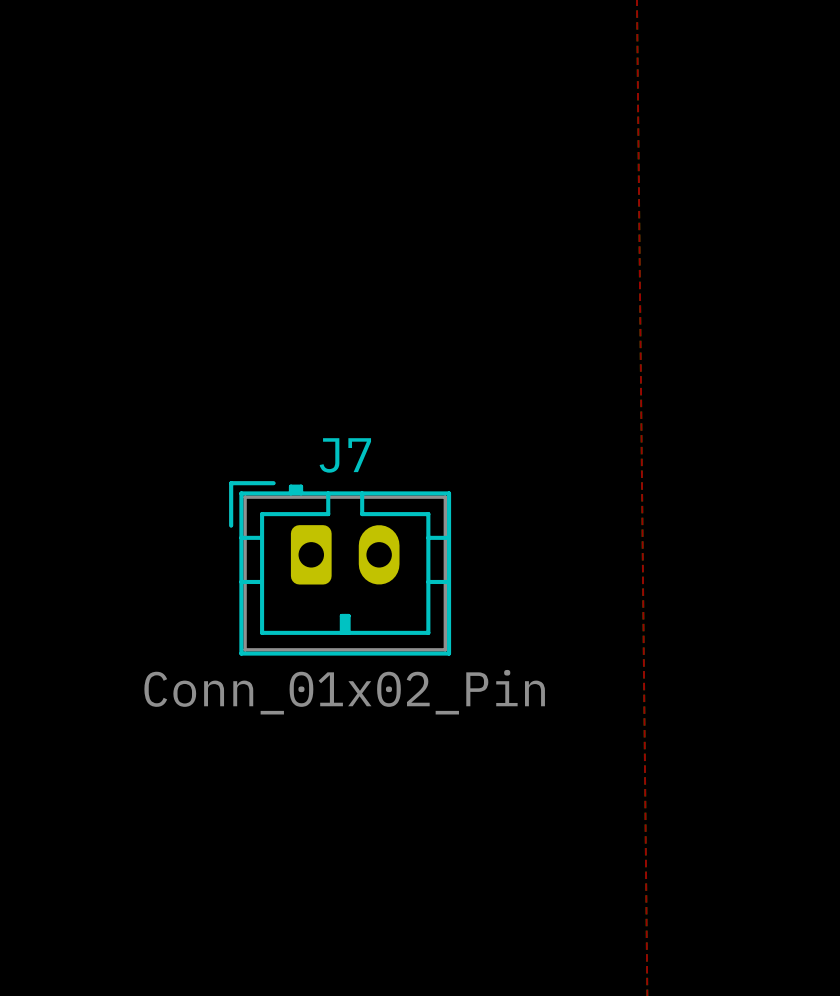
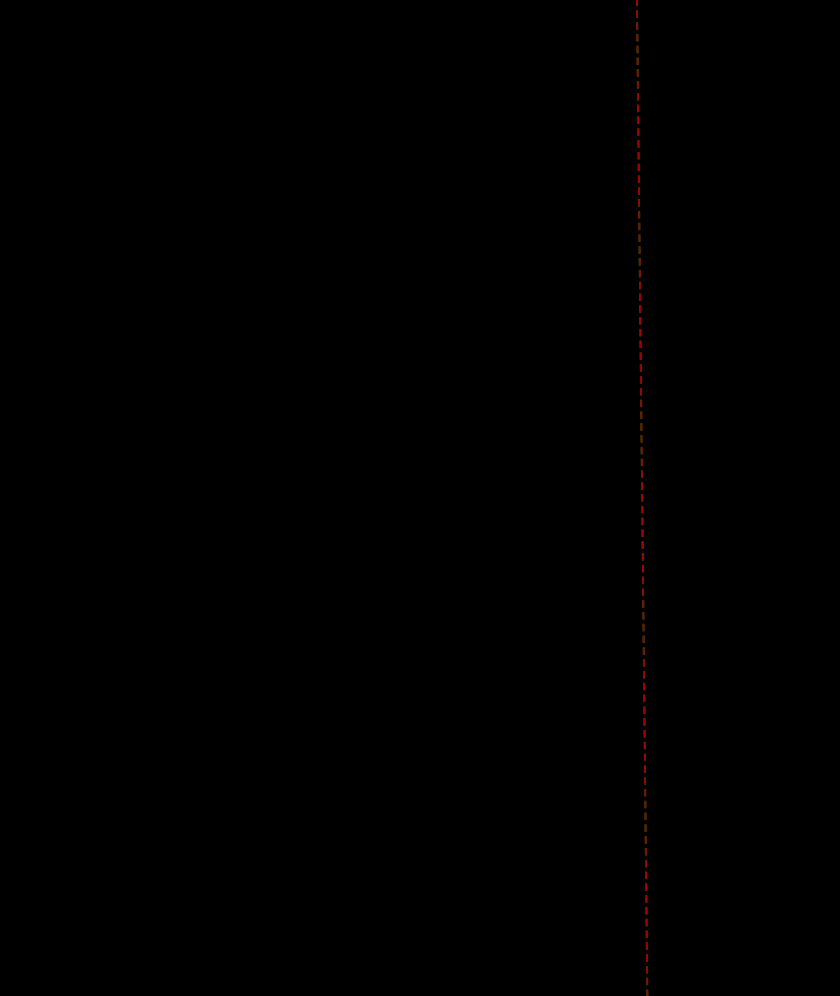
J7: Conn_01x02_Pin (340, 568) -> none

